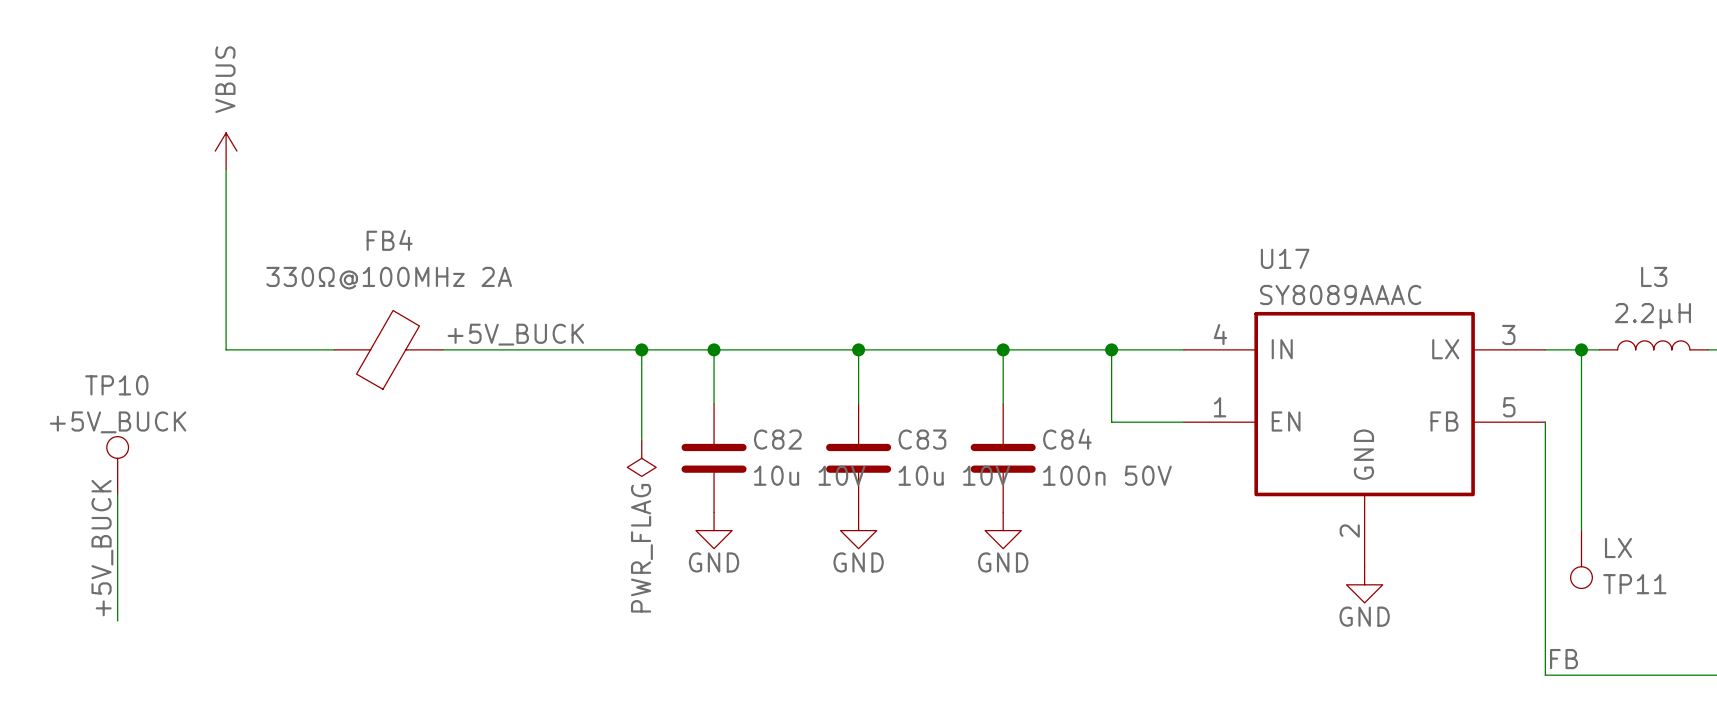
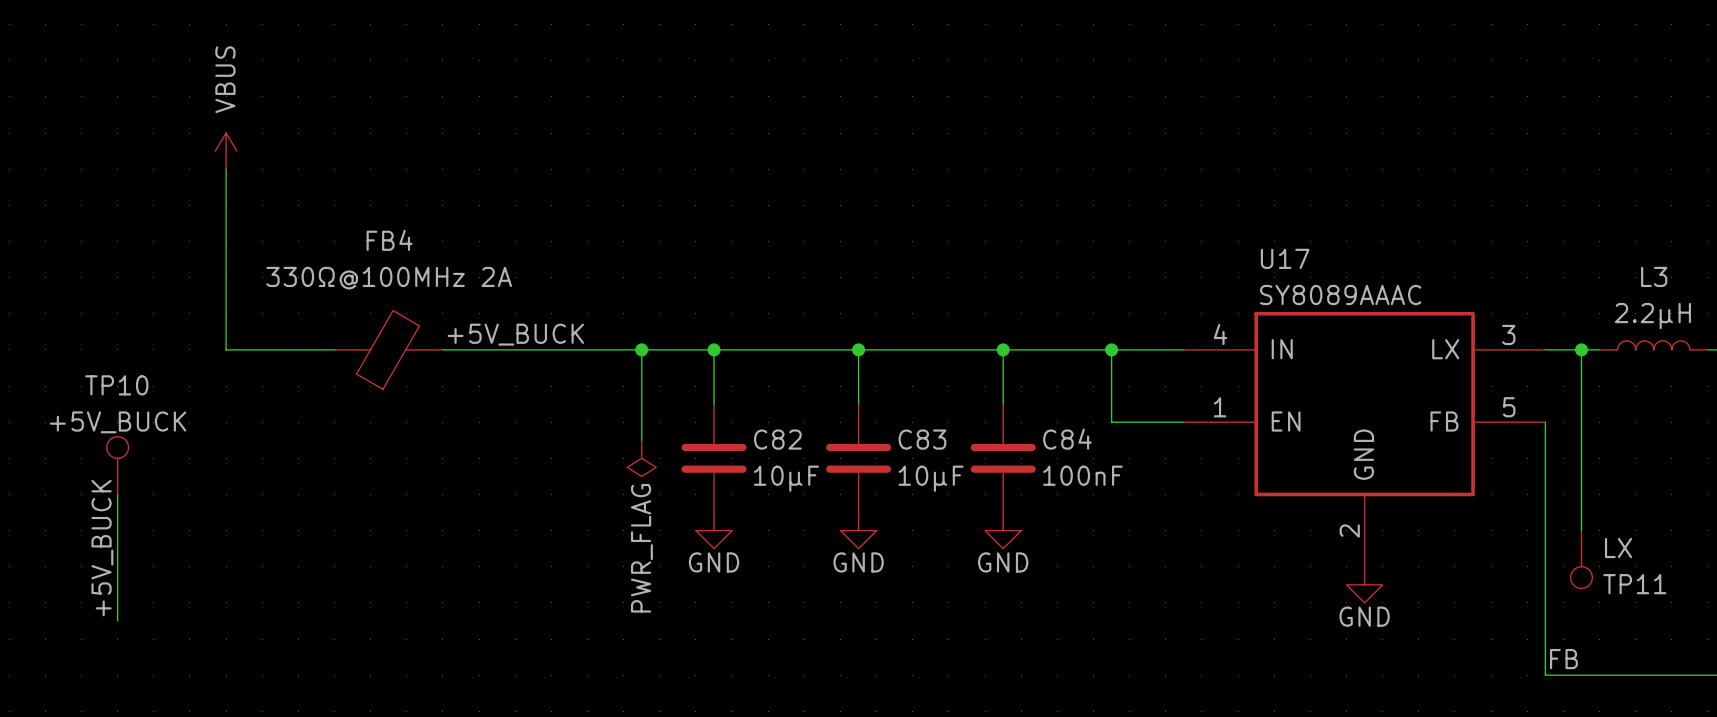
C82 value: 10u 10V (809, 475) -> 10µF (786, 478)
C83 value: 10u 10V (954, 475) -> 10µF (931, 478)
C84 value: 100n 50V (1107, 475) -> 100nF (1082, 475)

